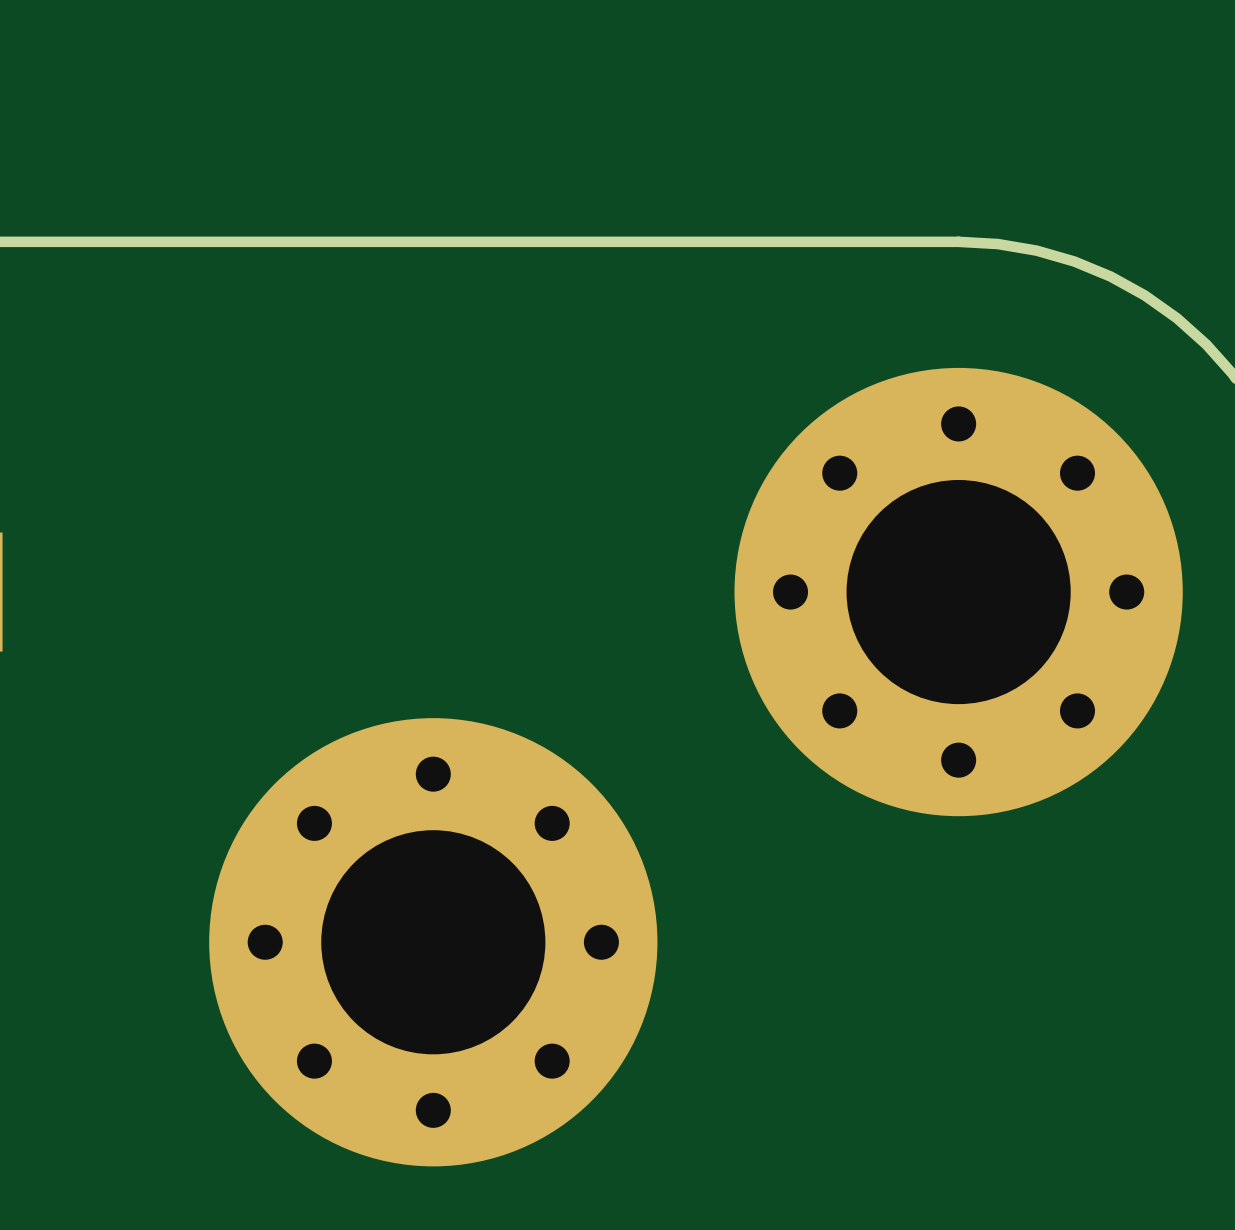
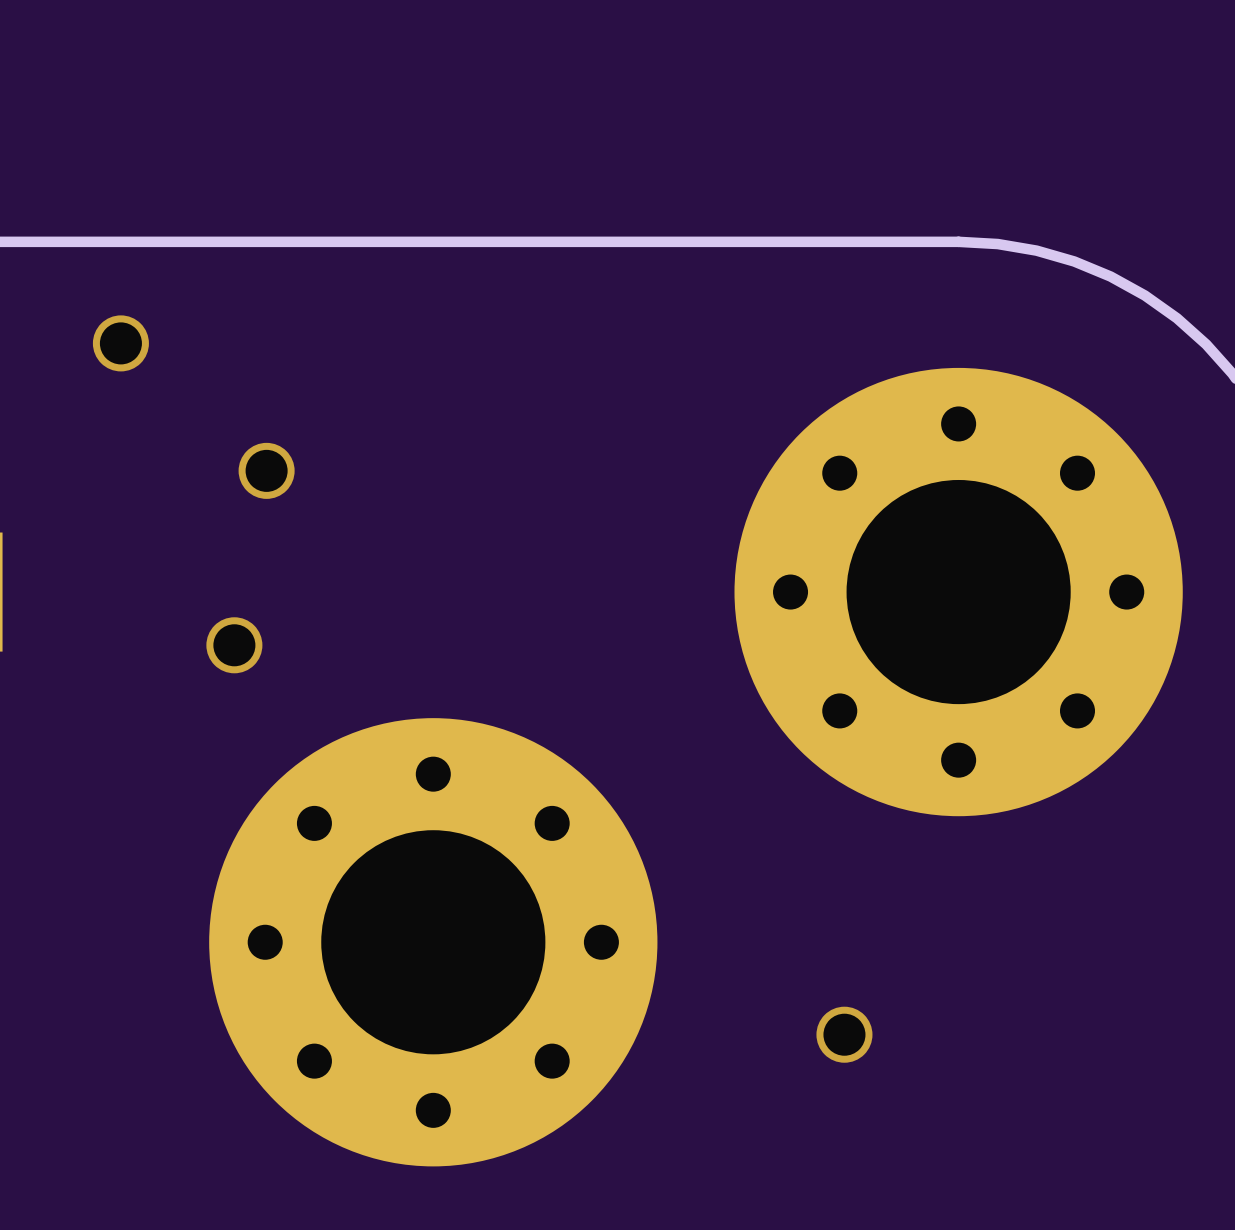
via: none -> (120, 343)
via: none -> (266, 470)
via: none -> (234, 645)
via: none -> (844, 1034)

